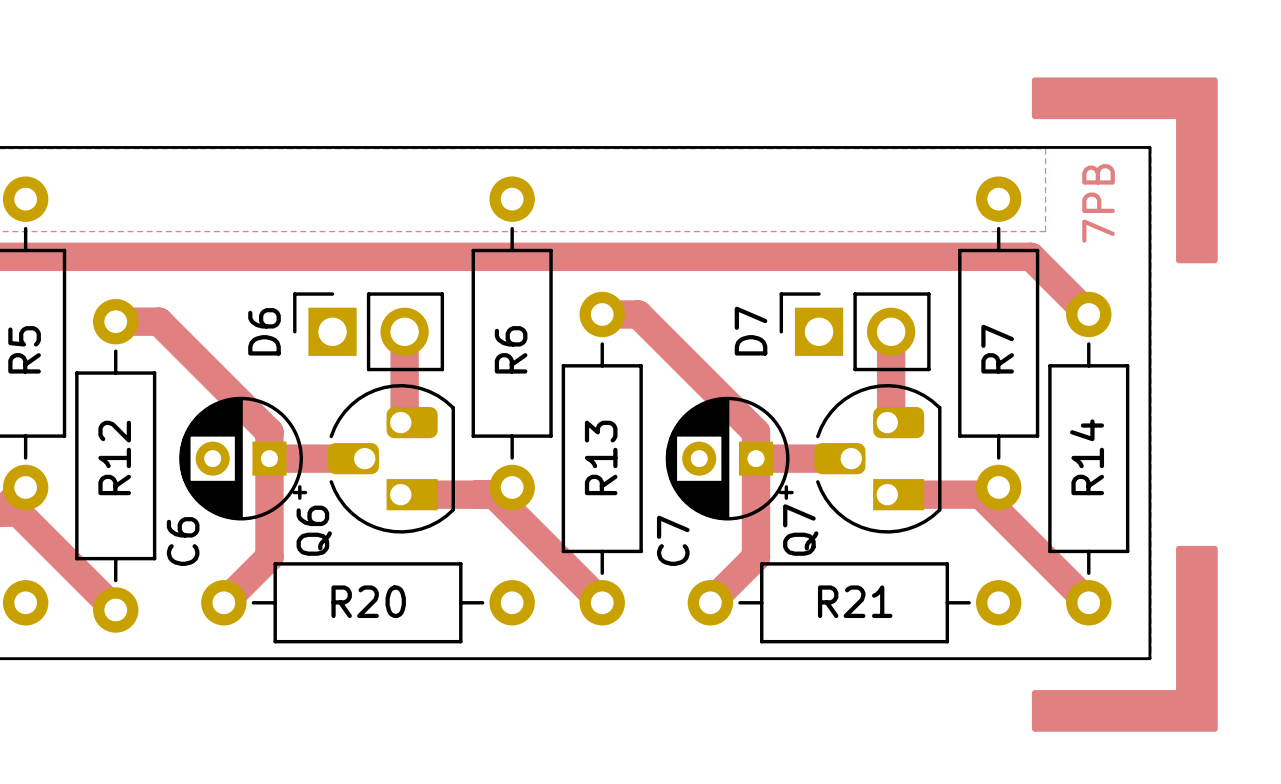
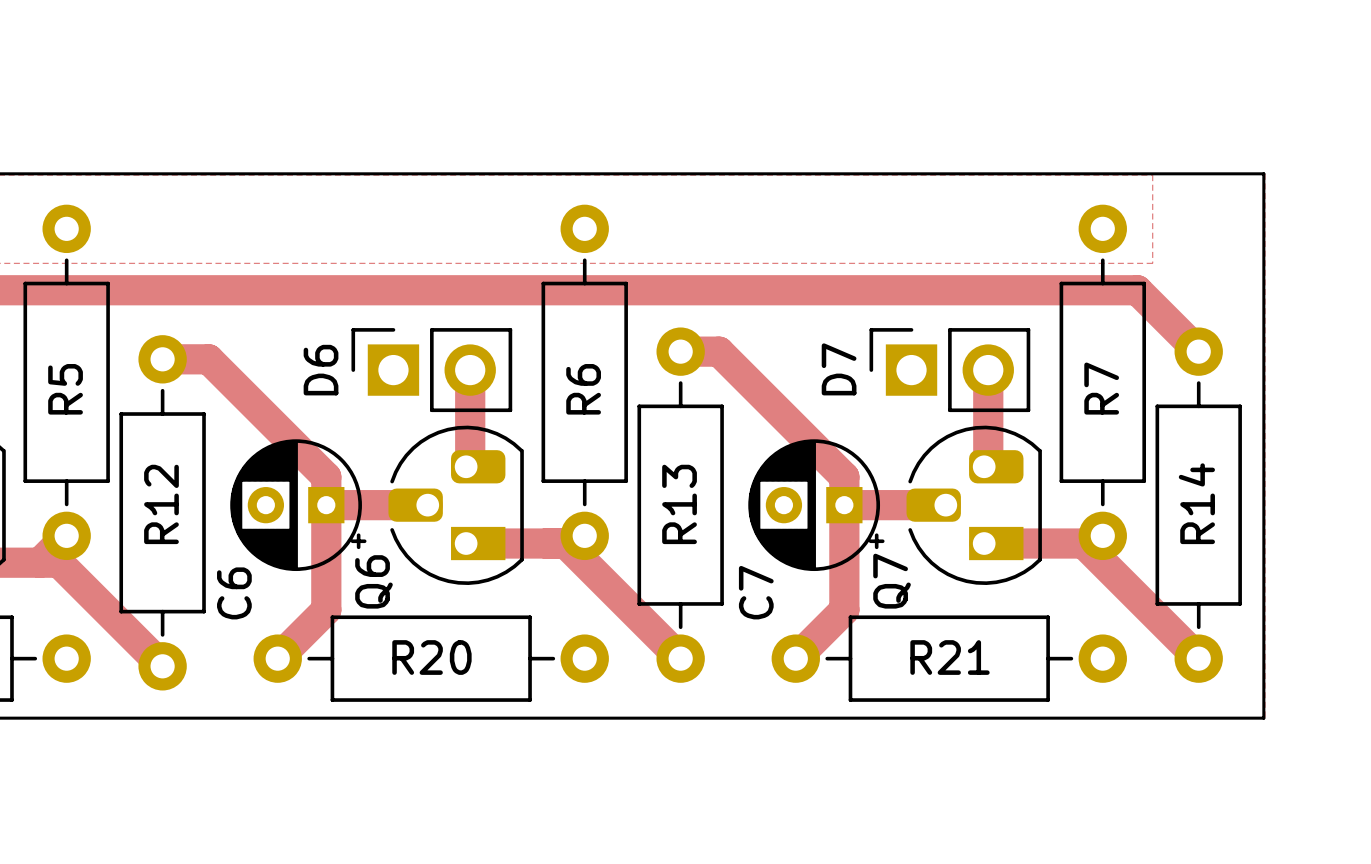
drawing: [1031, 77, 1218, 264] -> none
text: 7PB (1098, 203) -> none
drawing: [1031, 545, 1218, 732] -> none

